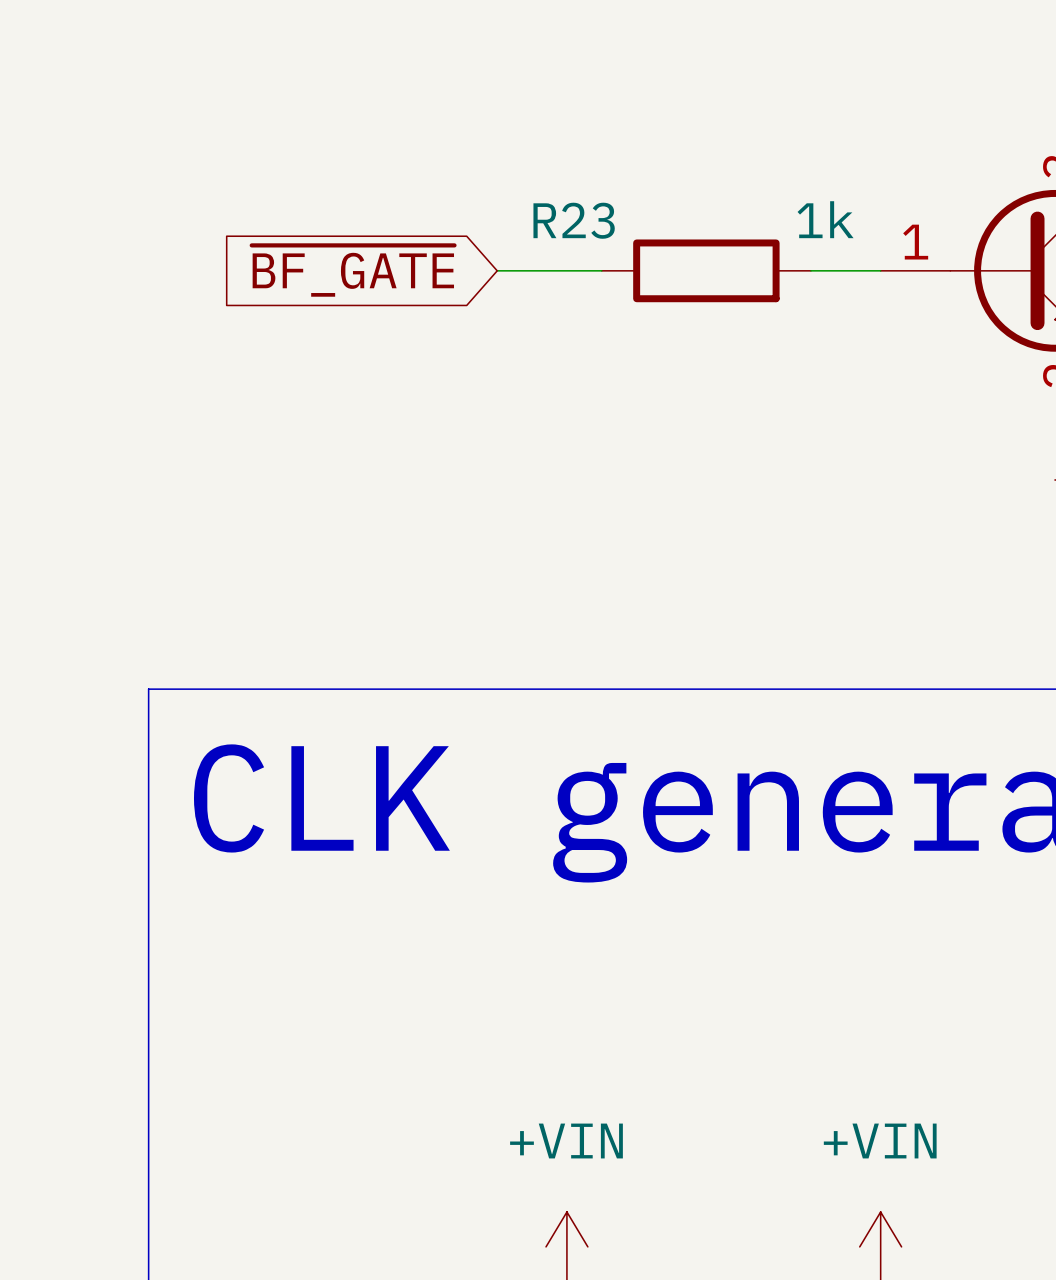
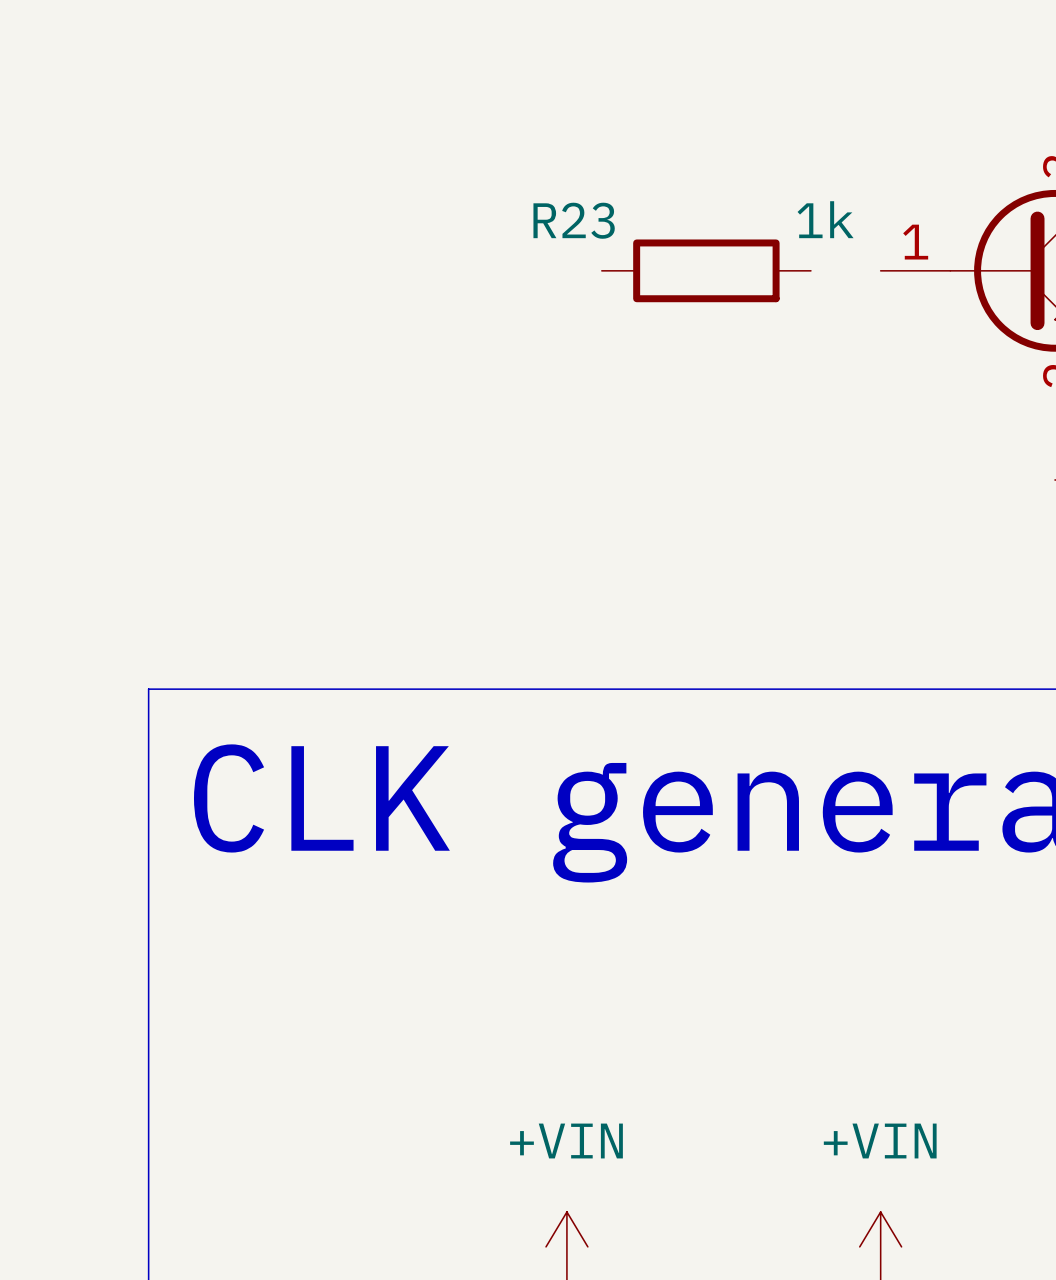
wire: (497, 270) (601, 270) -> none
wire: (810, 270) (880, 270) -> none
global label: ~{BF_GATE} (353, 271) -> none

